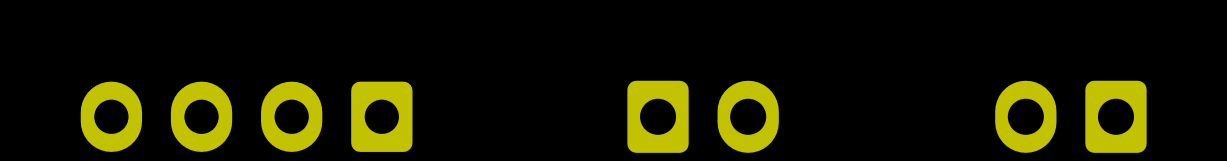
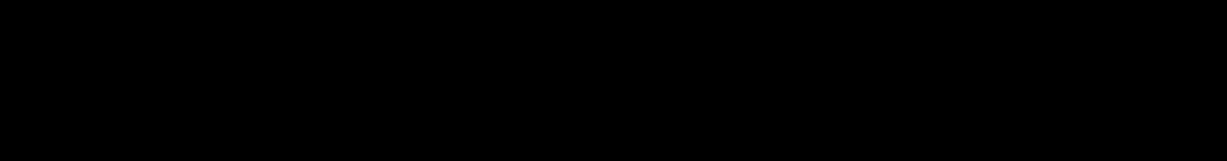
part: (246, 116) -> none
part: (703, 116) -> none
part: (1070, 116) -> none

